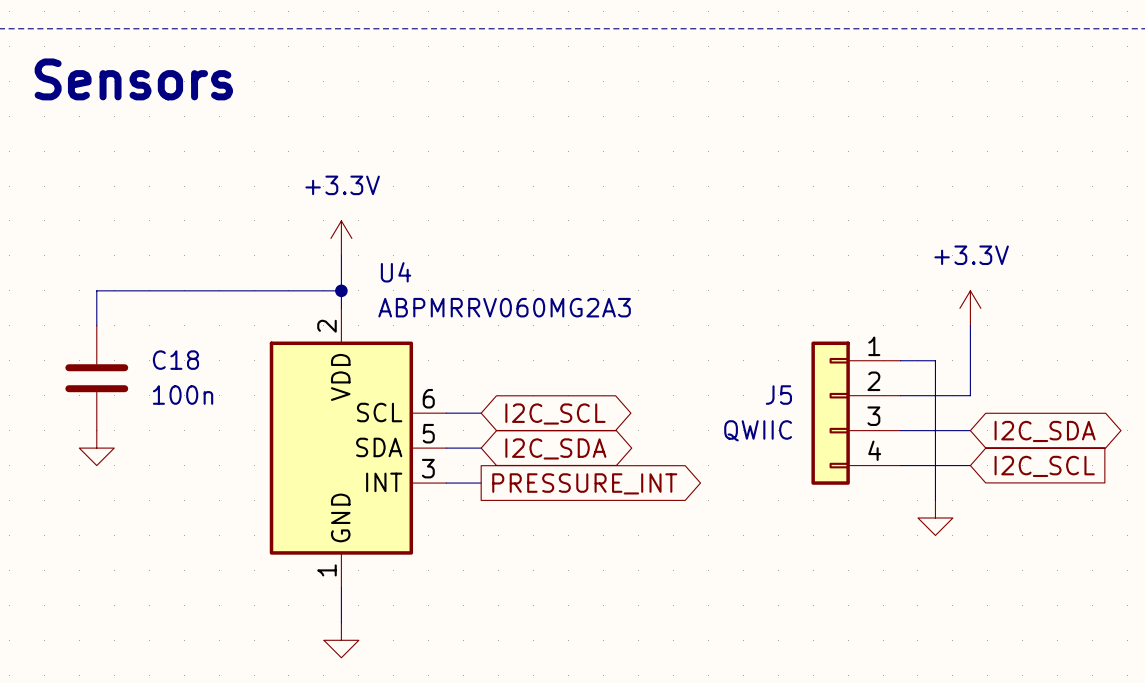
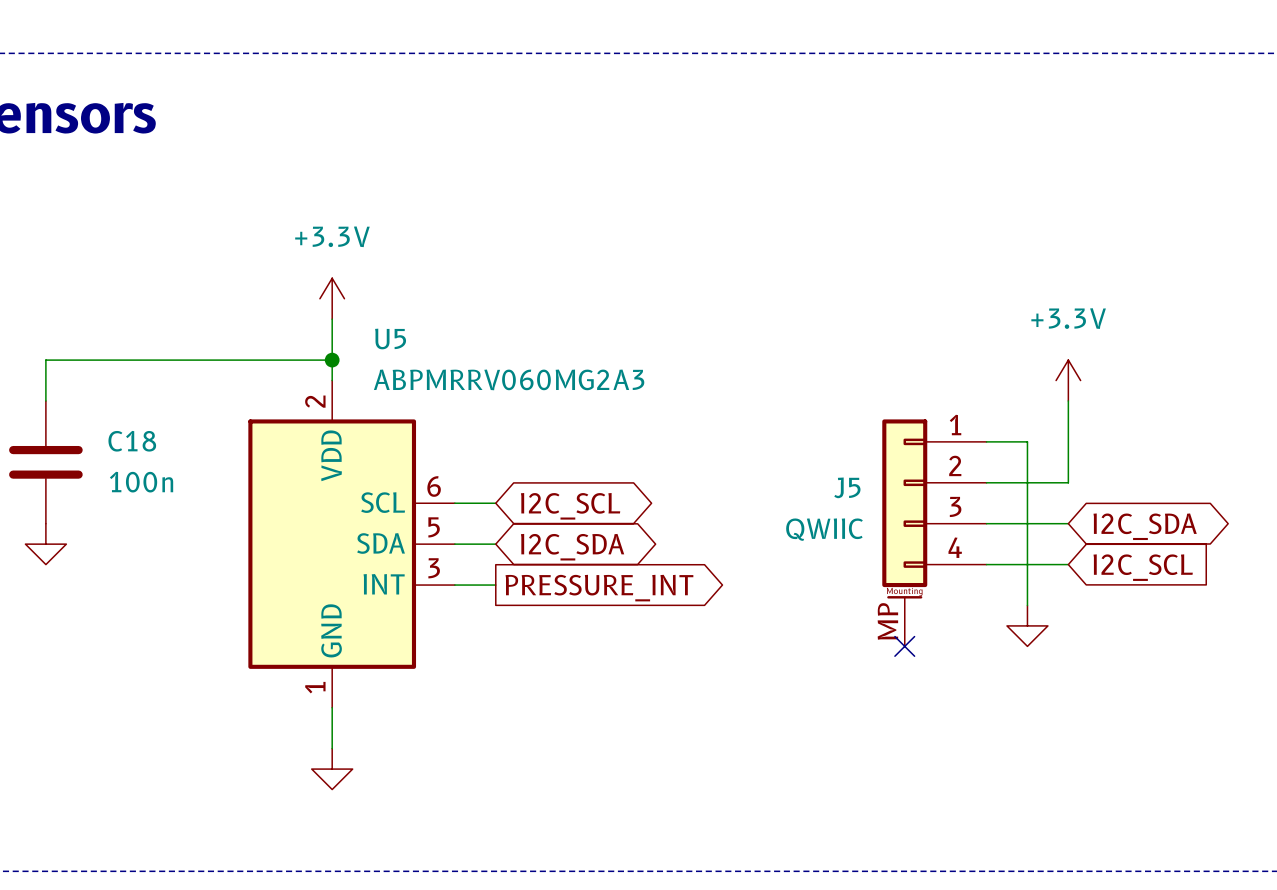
U4 name: U4 (396, 272) -> U5 (390, 338)
J5 symbol: [811, 341, 901, 485] -> [882, 419, 987, 647]
no-connect mark: none -> (904, 646)

